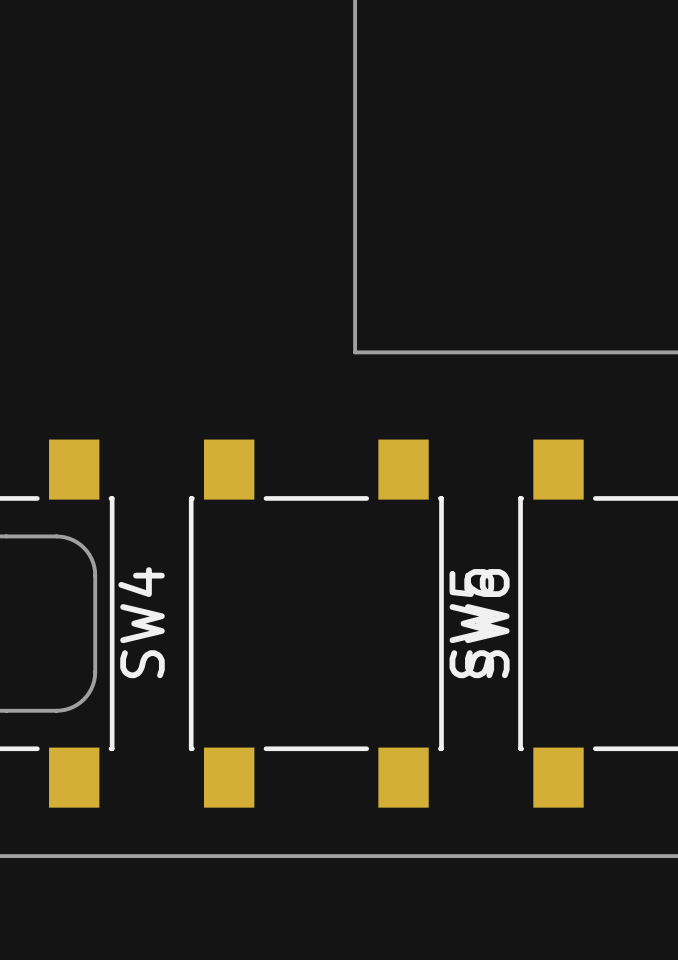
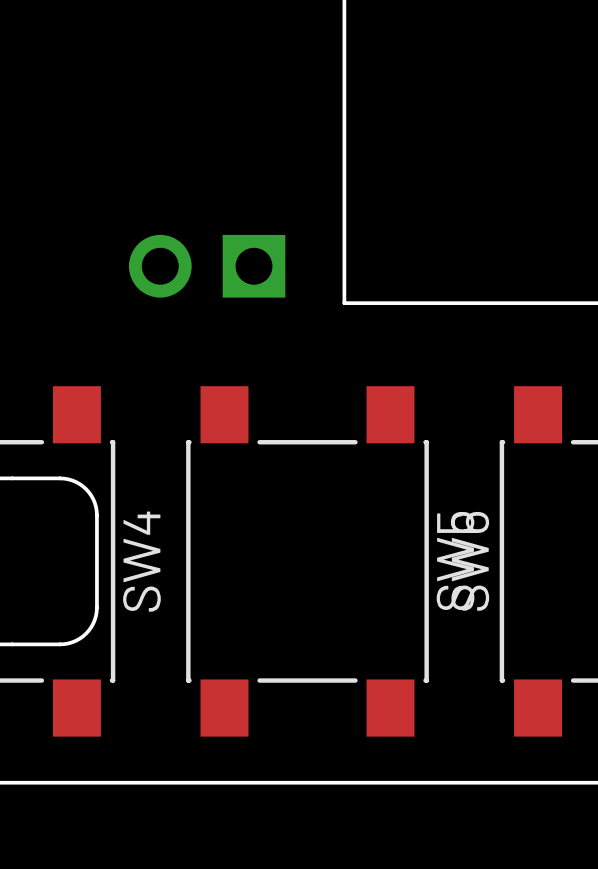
part: none -> (207, 266)

